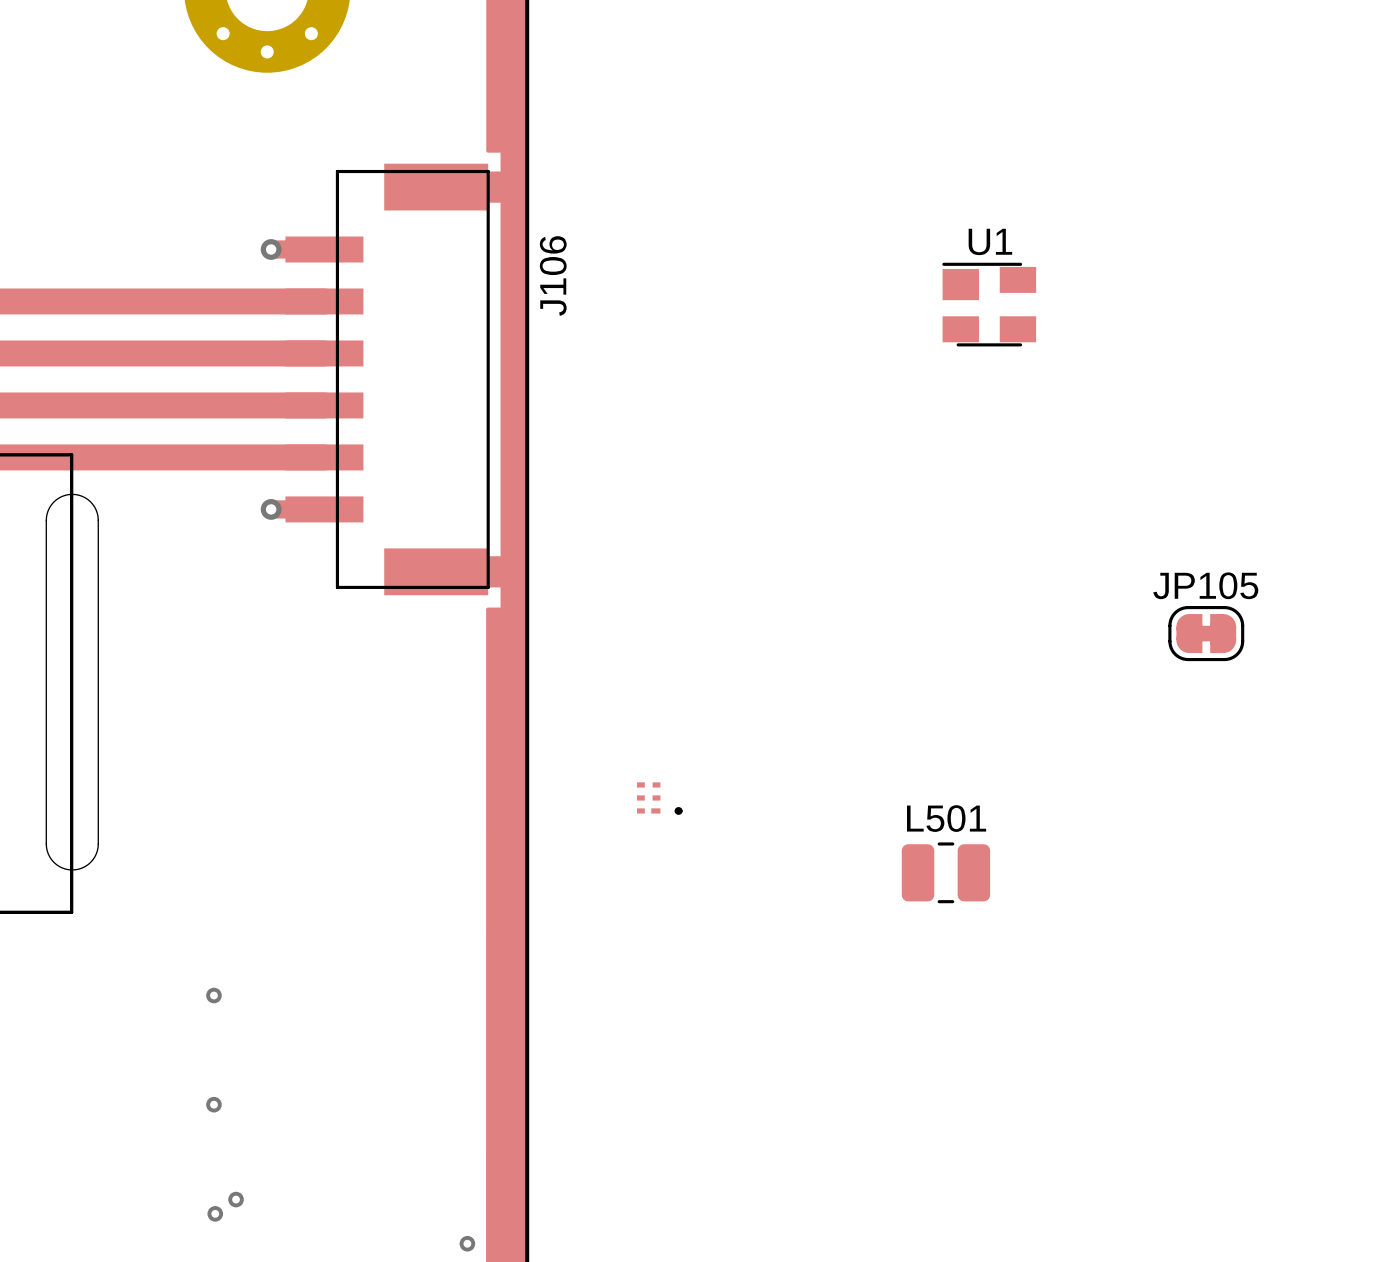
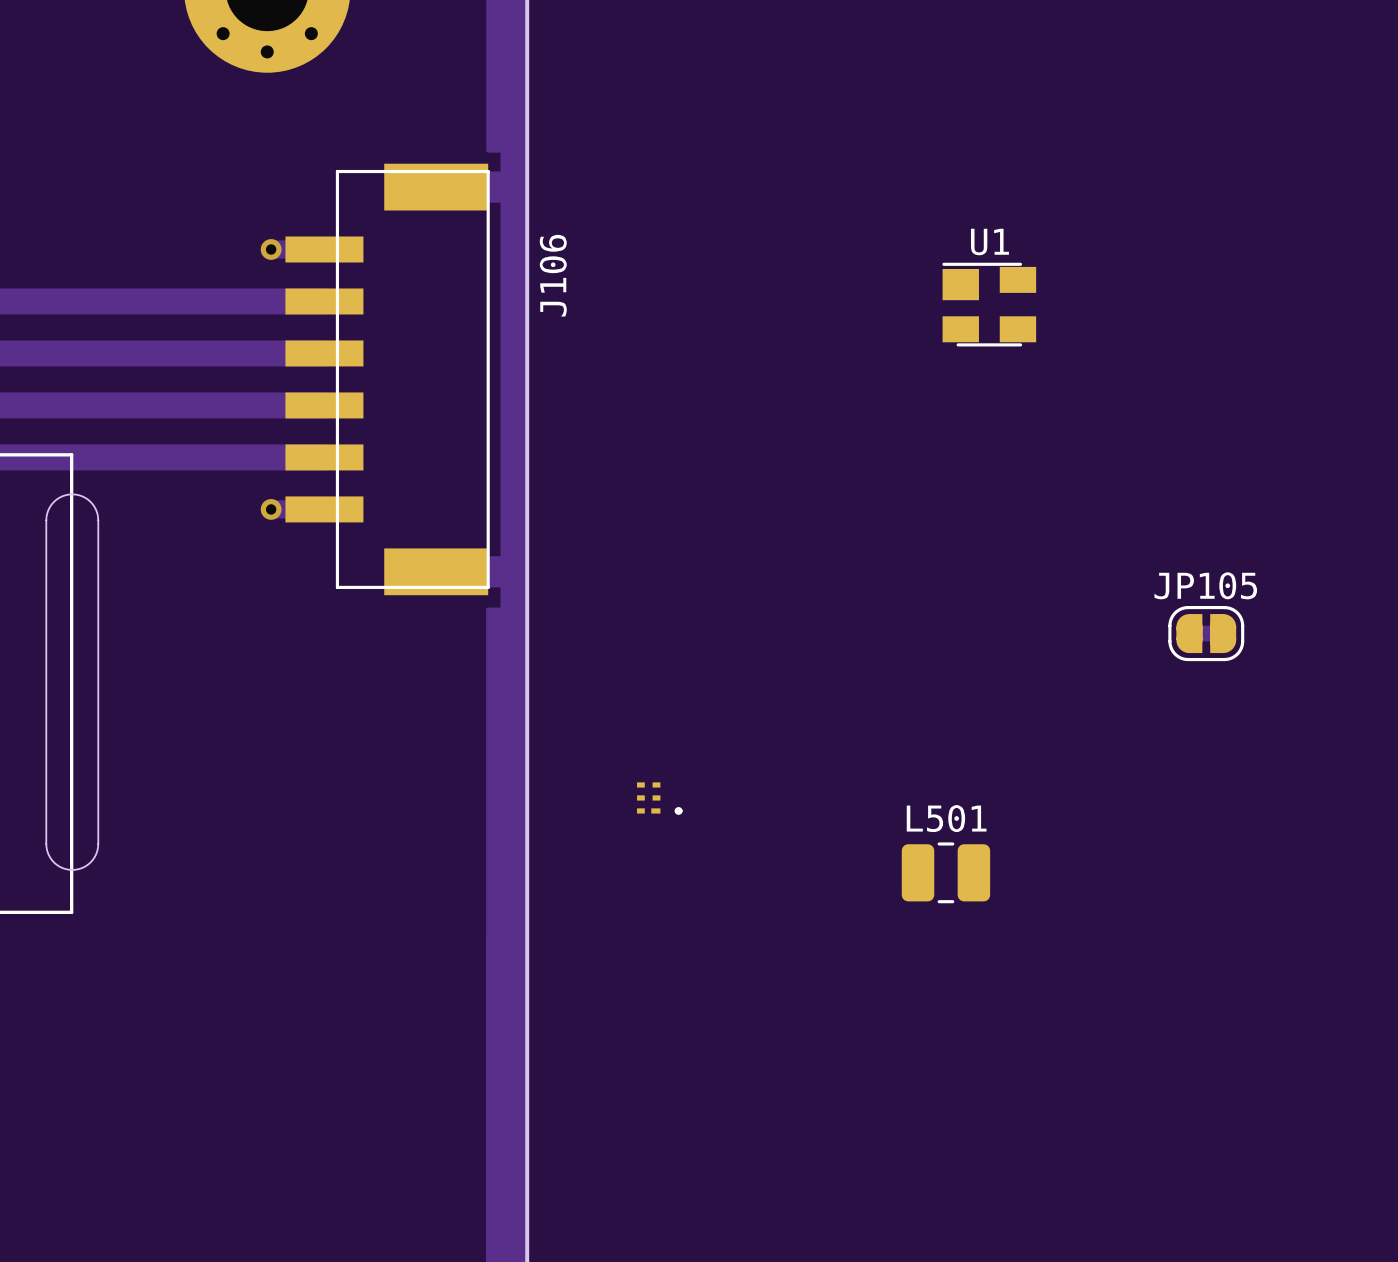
via: (213, 995) -> none
via: (213, 1104) -> none
via: (236, 1199) -> none
via: (215, 1213) -> none
via: (467, 1243) -> none

